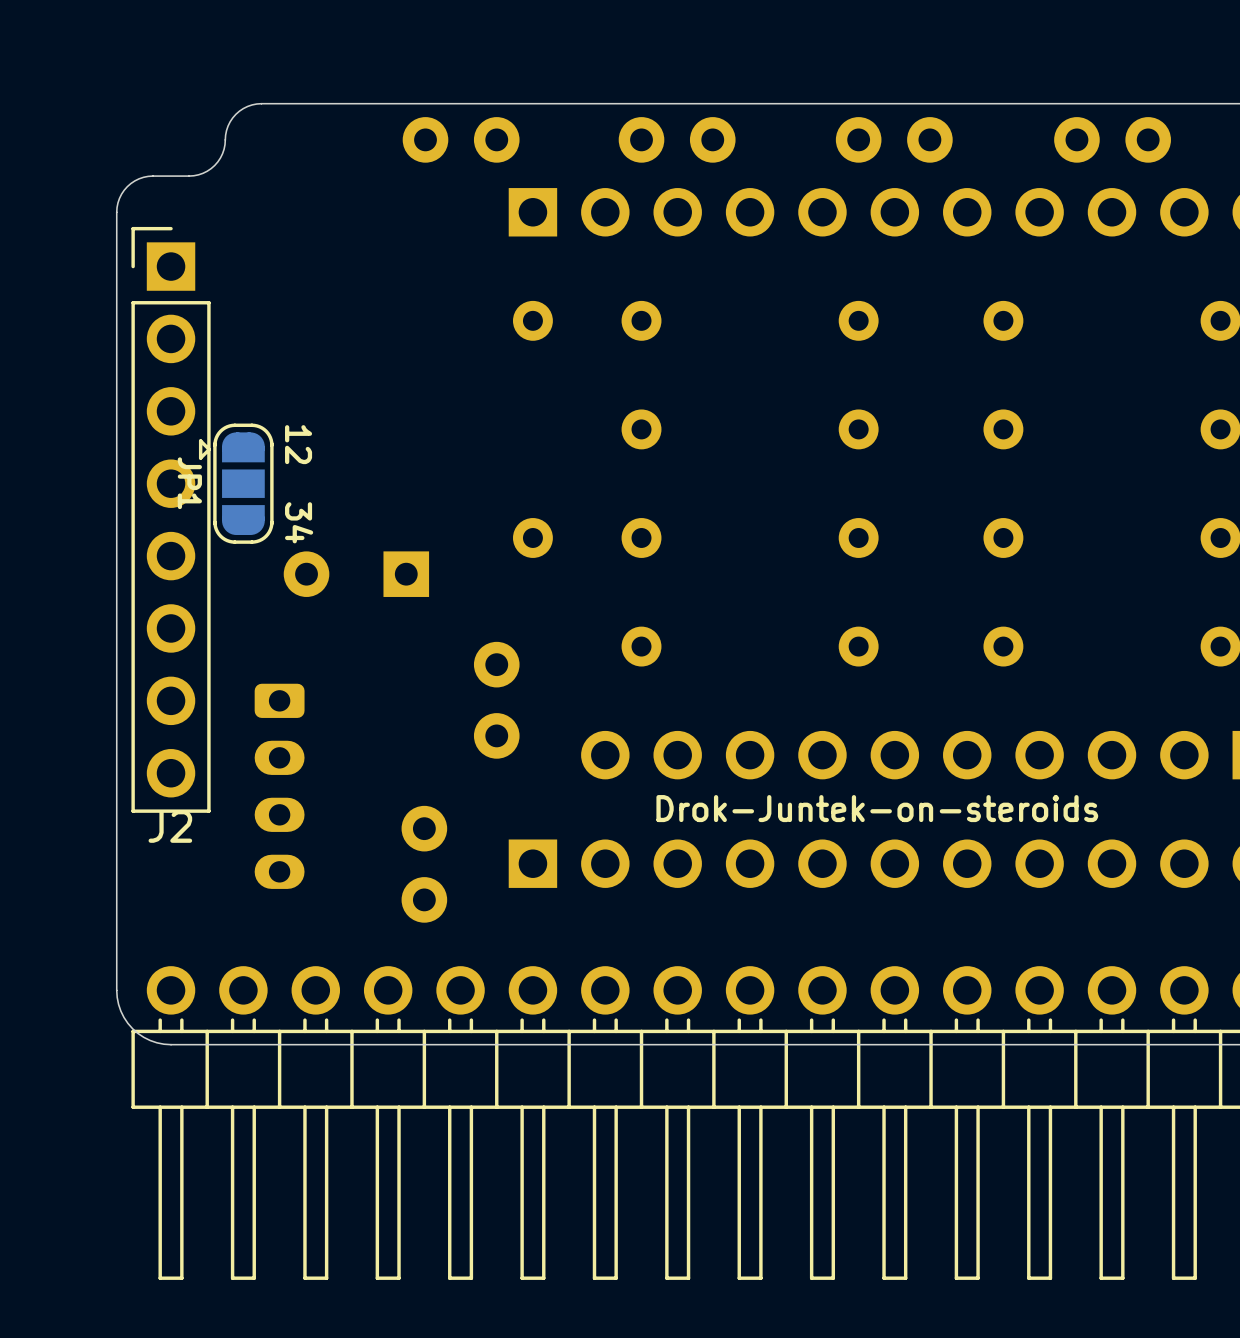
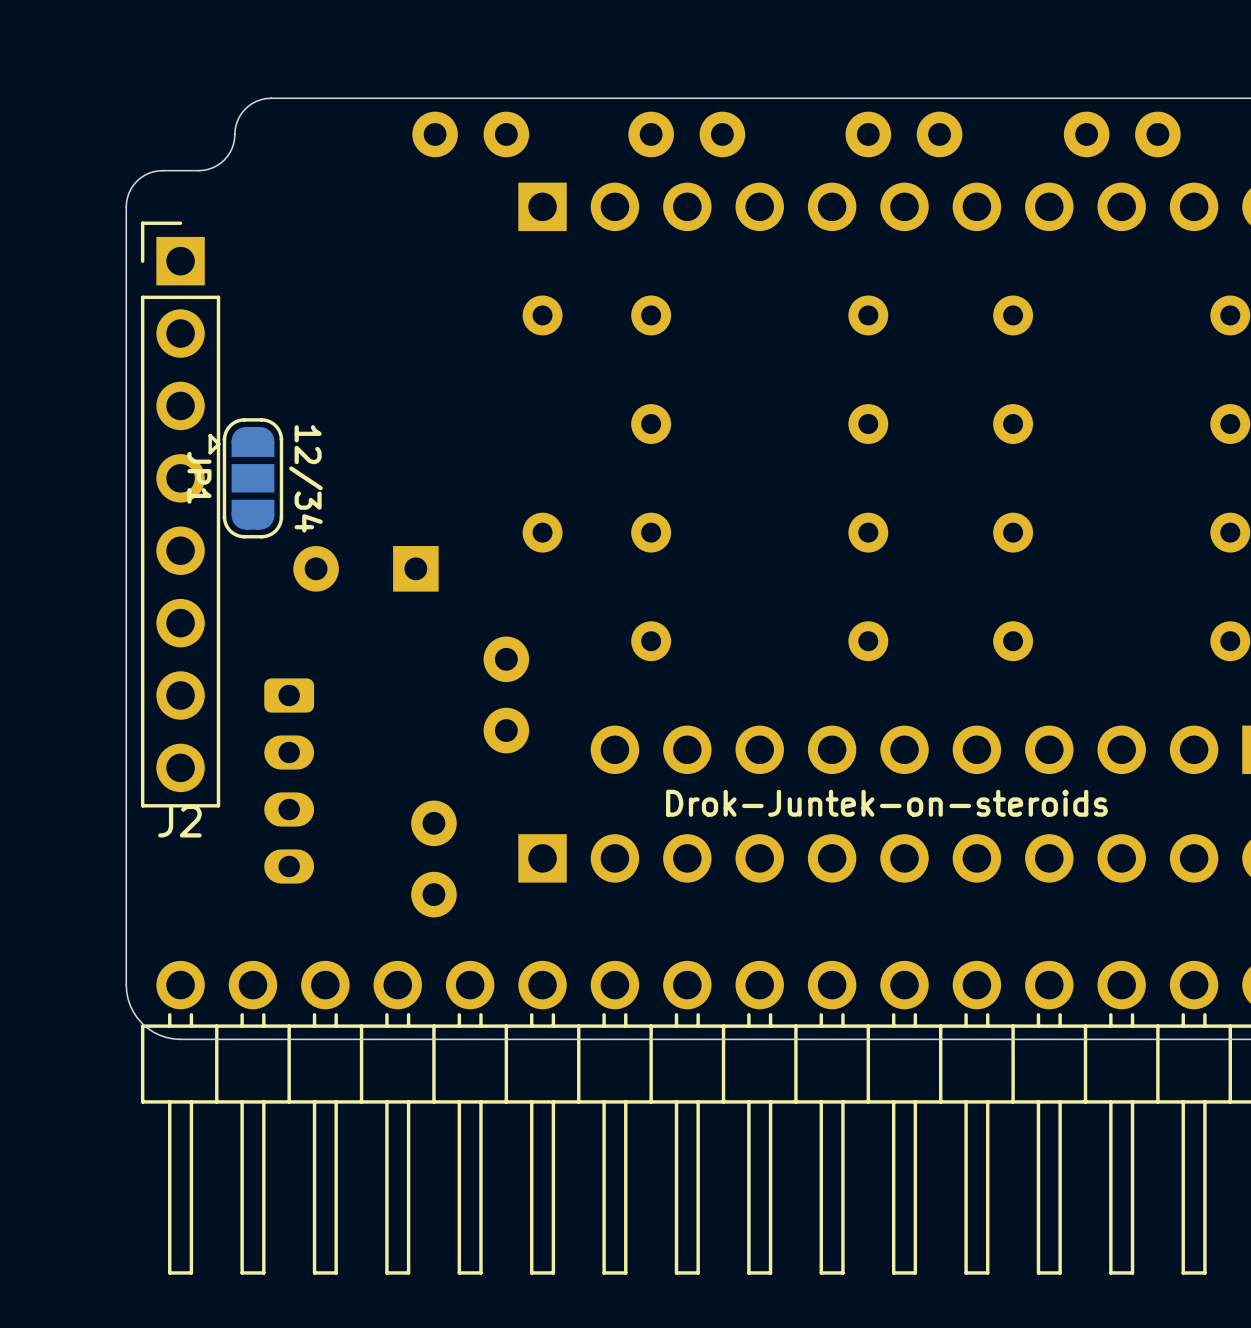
text: 12 34 (299, 484) -> 12/34 (305, 478)

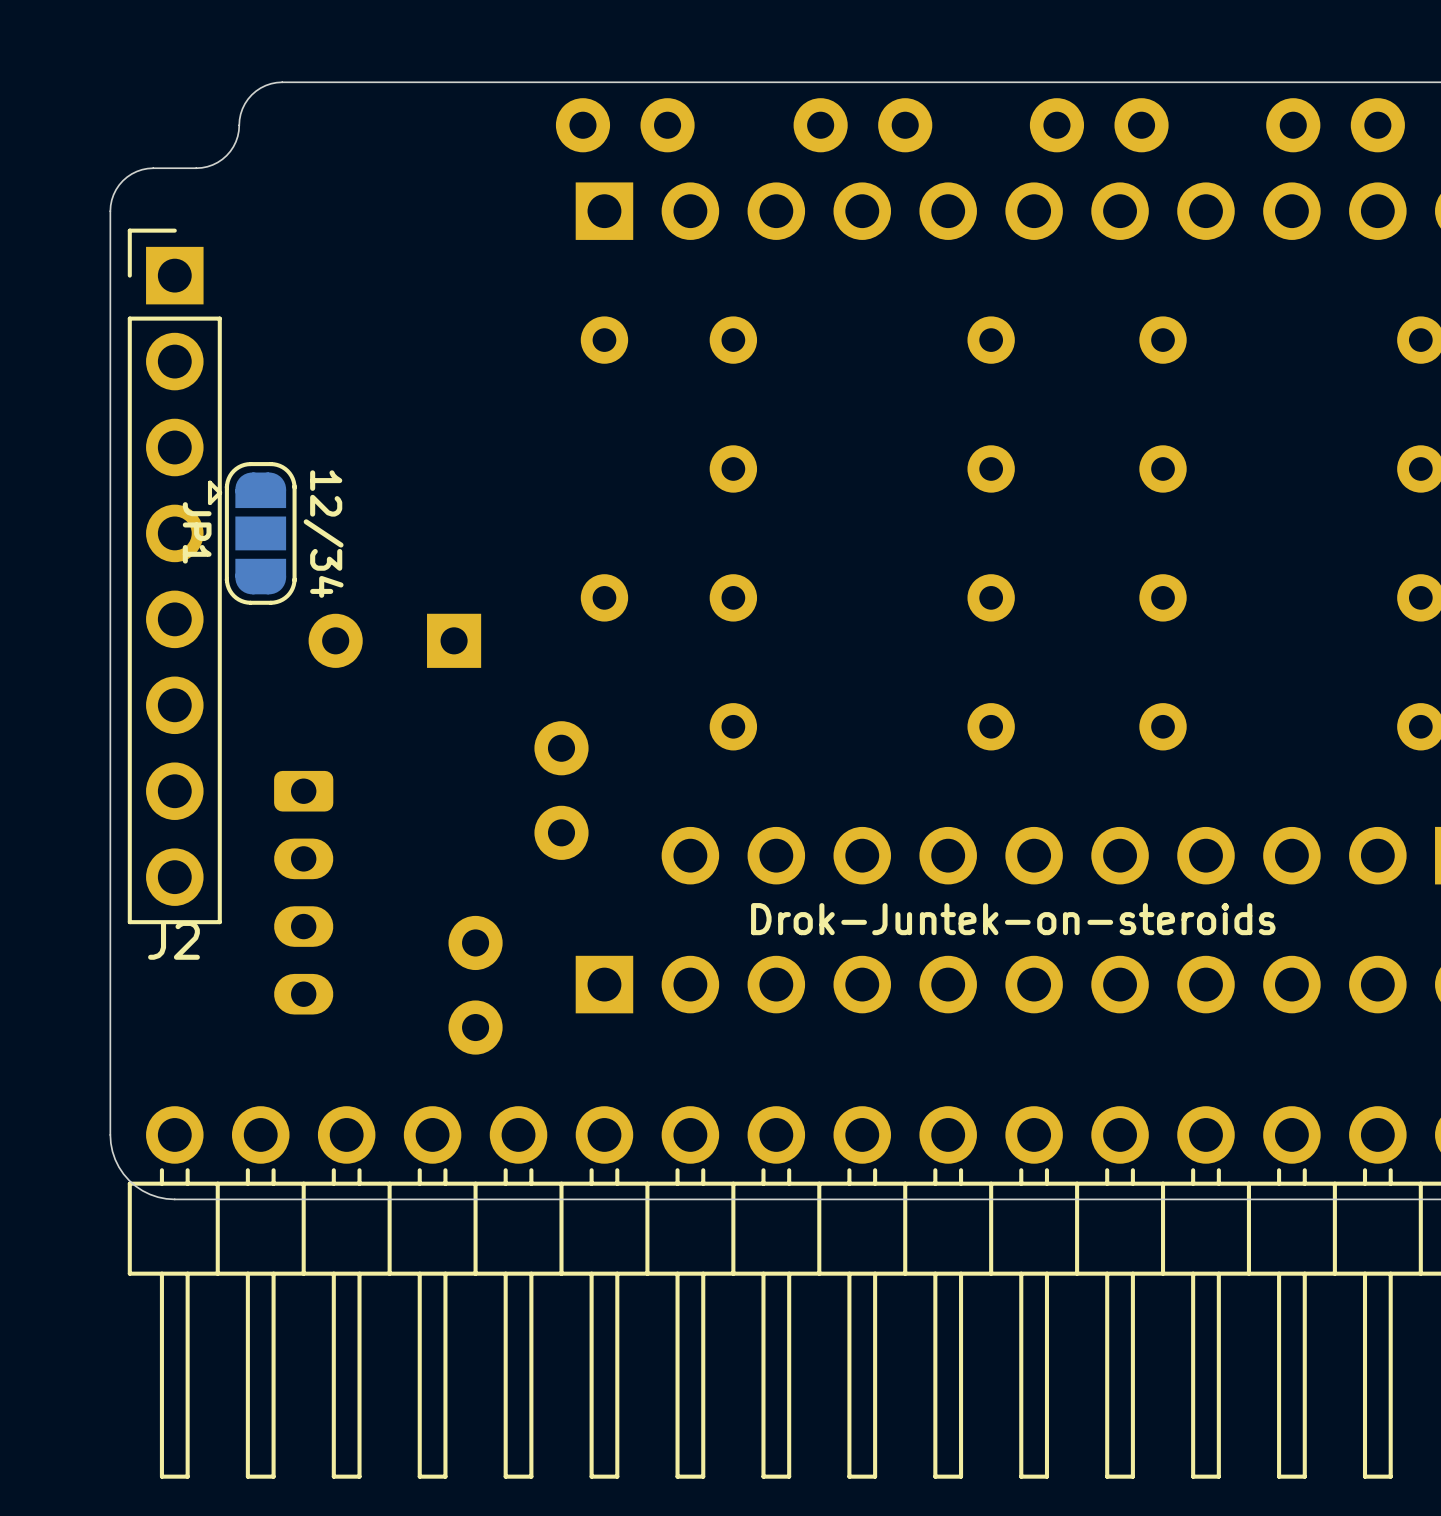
part: (470, 134) -> none
part: none -> (625, 125)
part: (686, 134) -> none
part: none -> (862, 125)
part position: (903, 134) -> (1099, 125)
part position: (1122, 134) -> (1335, 125)

